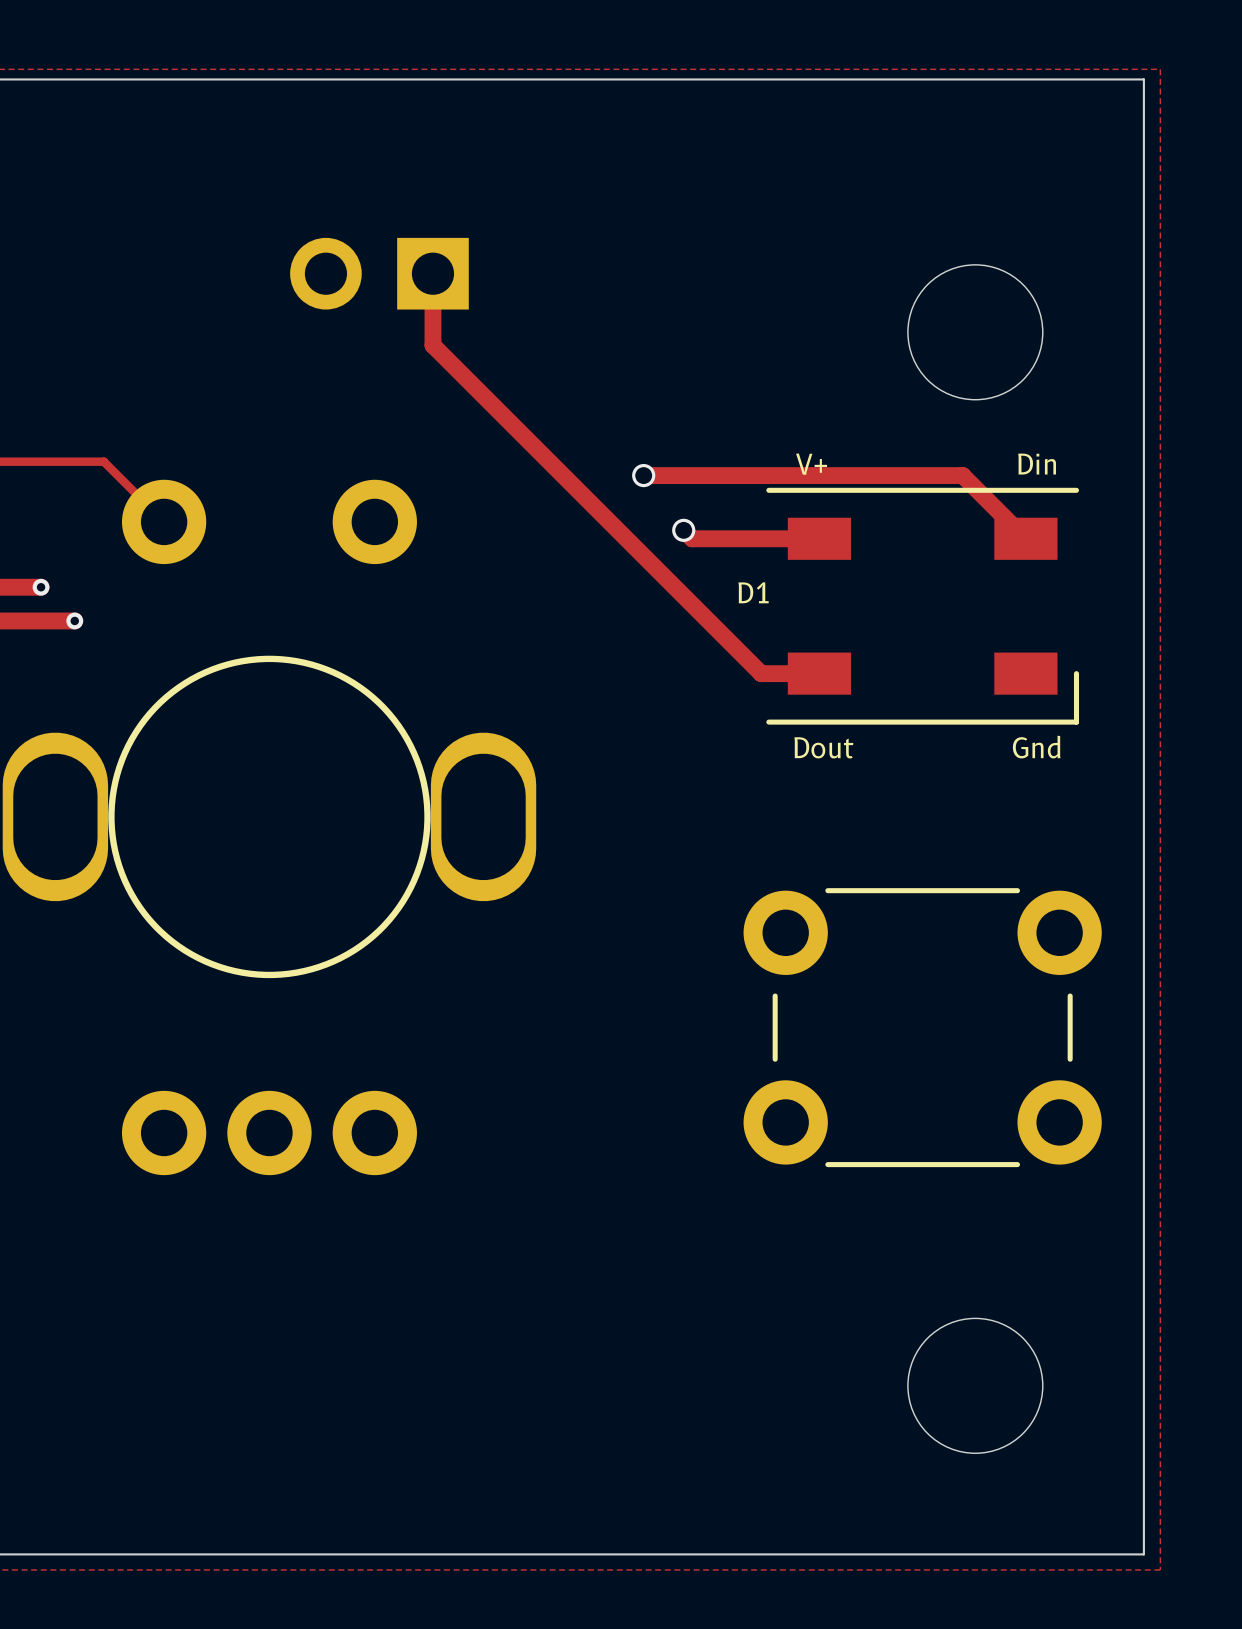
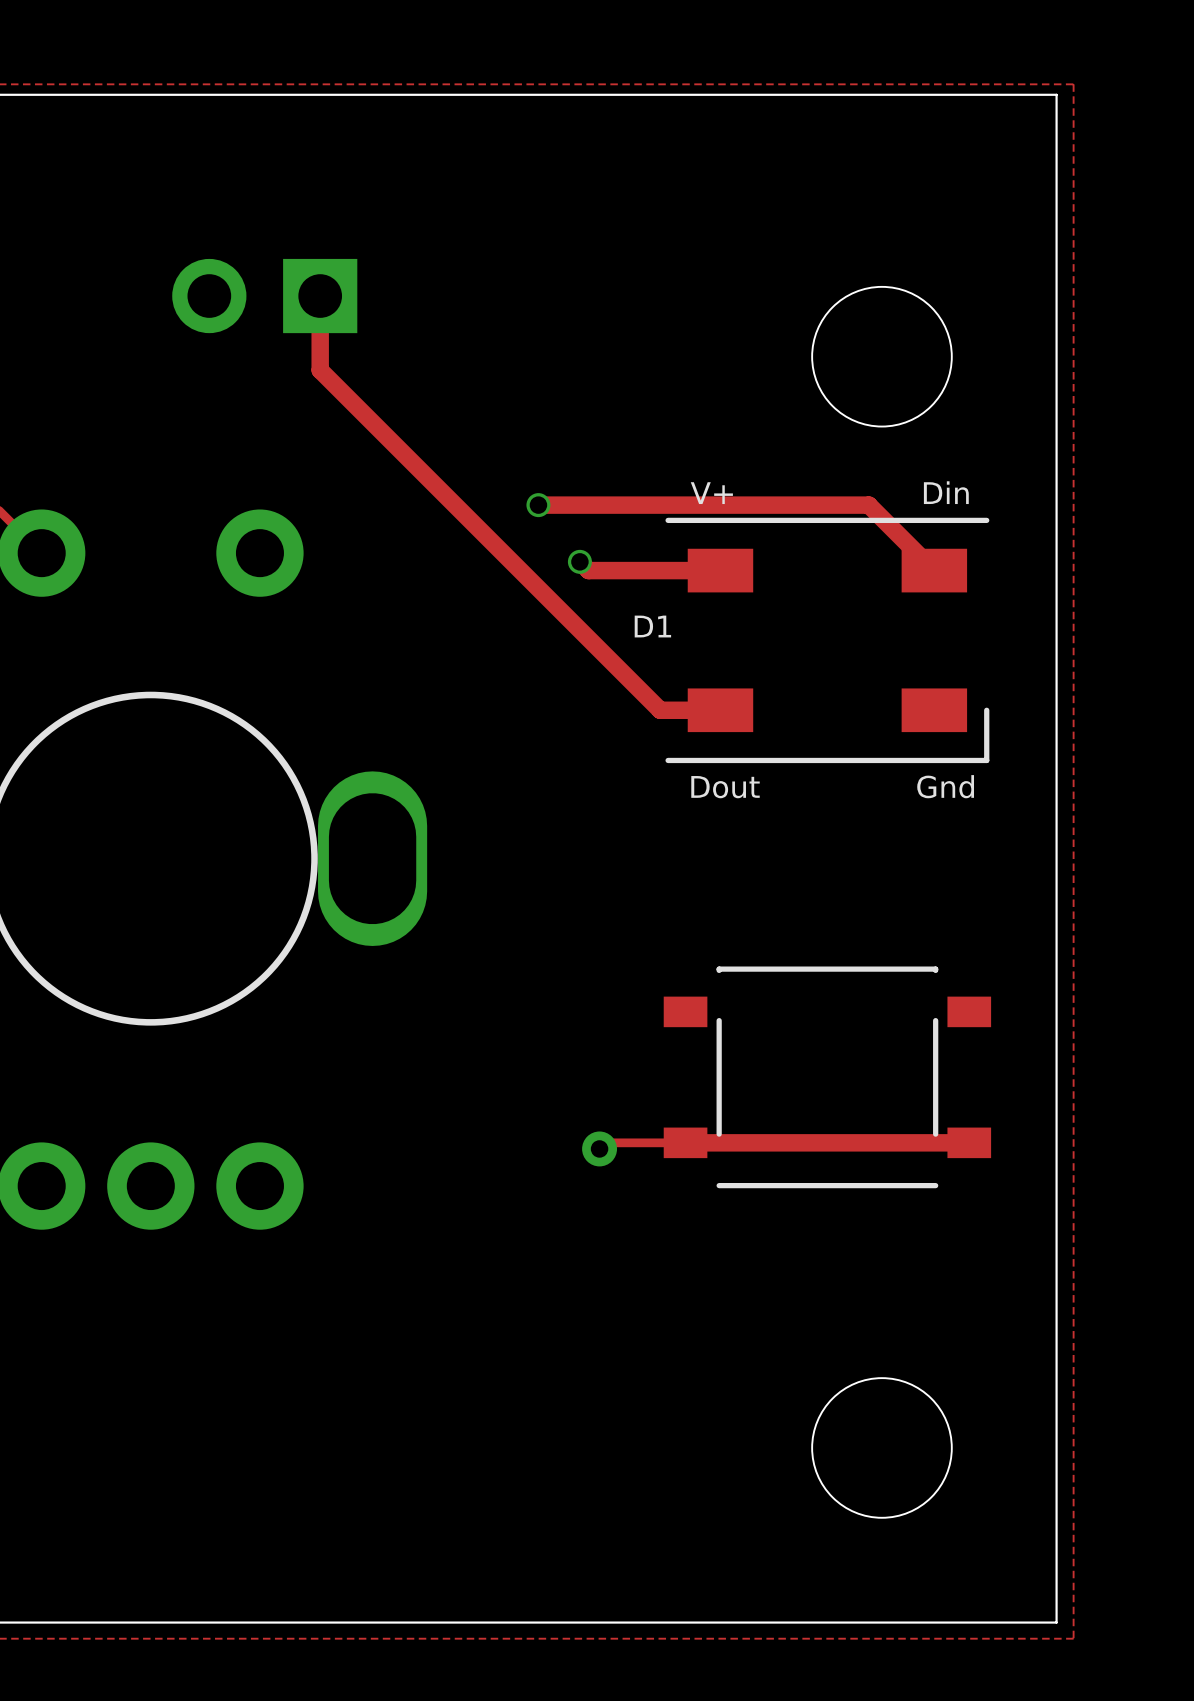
part footprint: [743, 888, 1102, 1168] -> [663, 966, 992, 1189]
track: none -> (969, 1142) (605, 1142) (599, 1148)
via: none -> (599, 1148)

